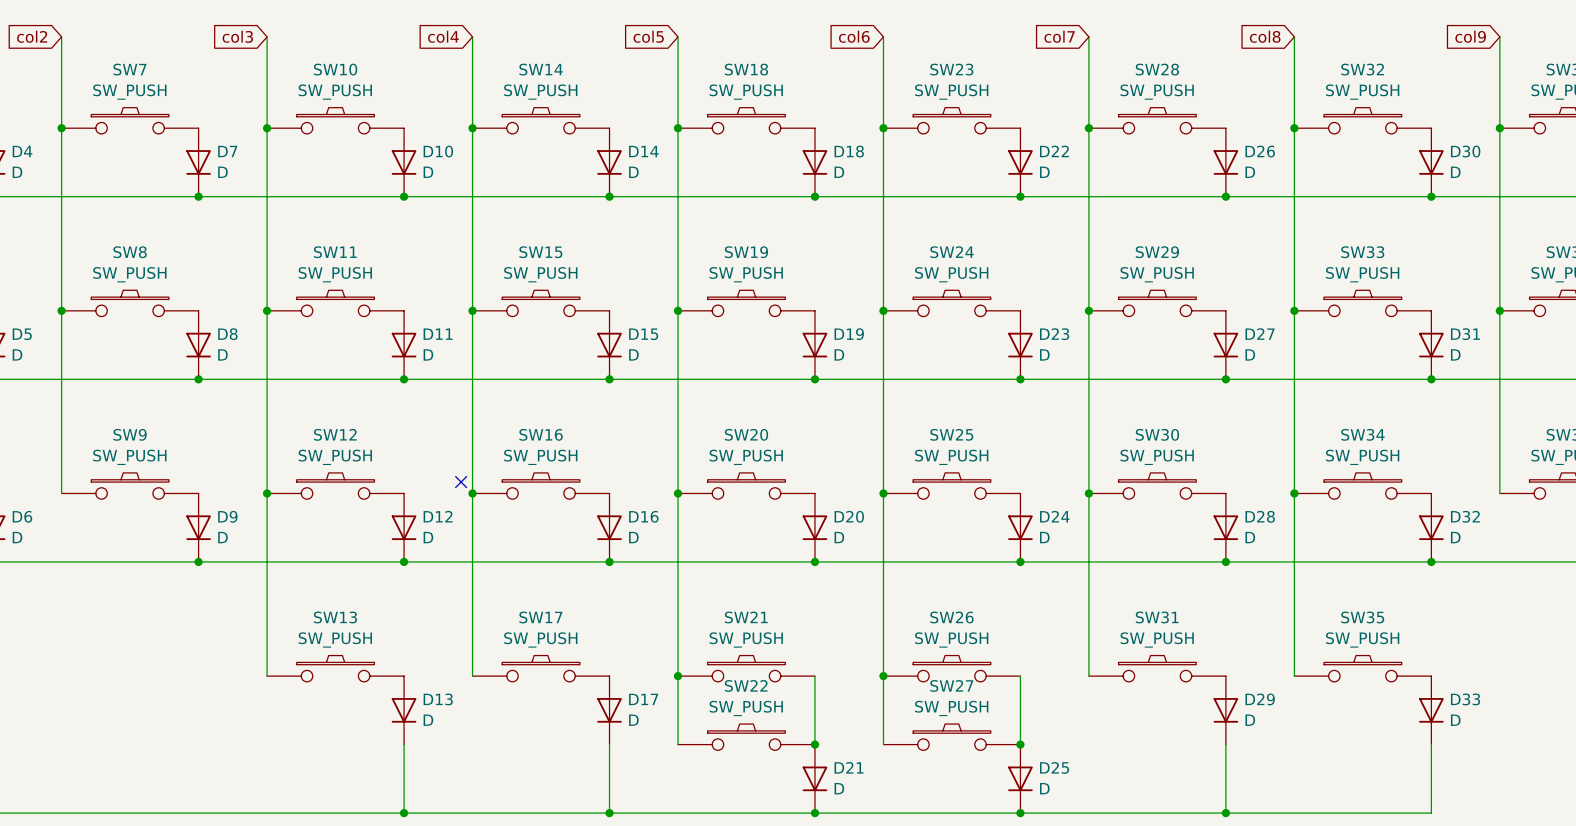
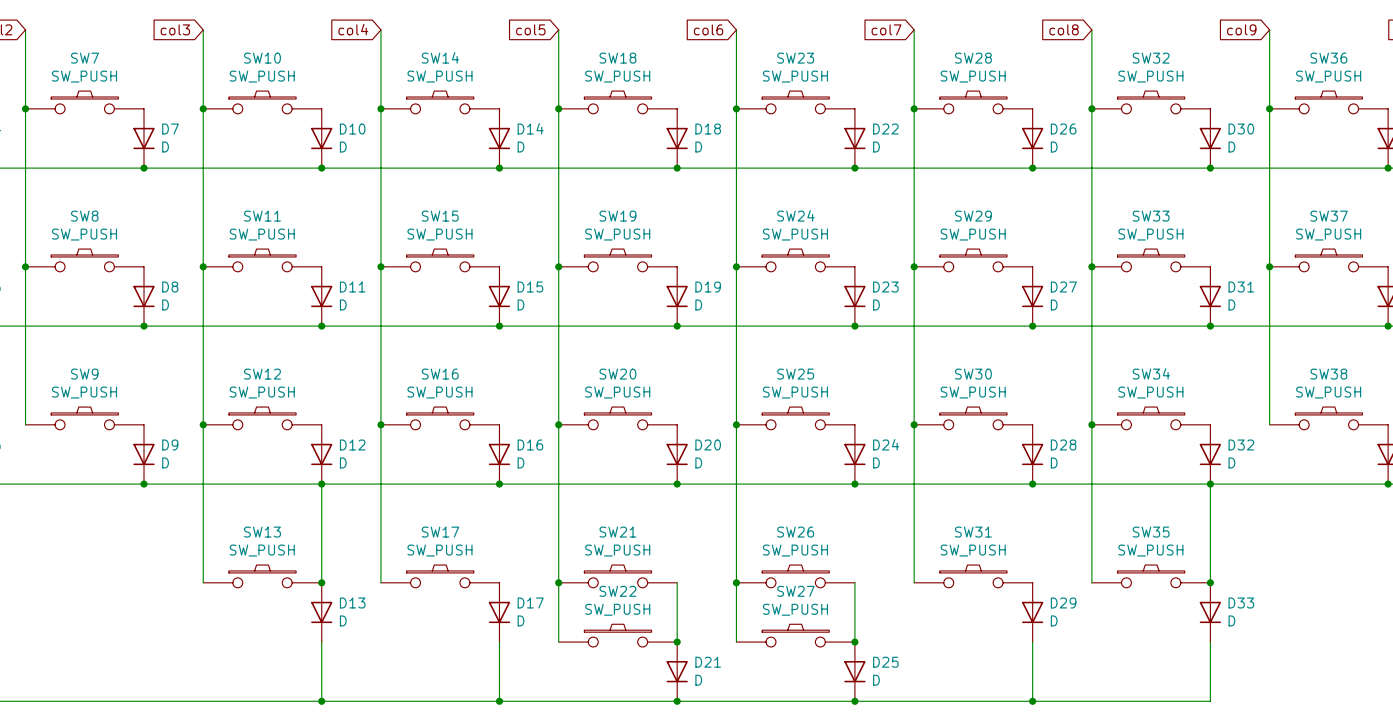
no-connect mark: (461, 482) -> none
wire: none -> (321, 484) (321, 582)
wire: none -> (1210, 484) (1210, 582)
junction: none -> (321, 582)
junction: none -> (1210, 582)

